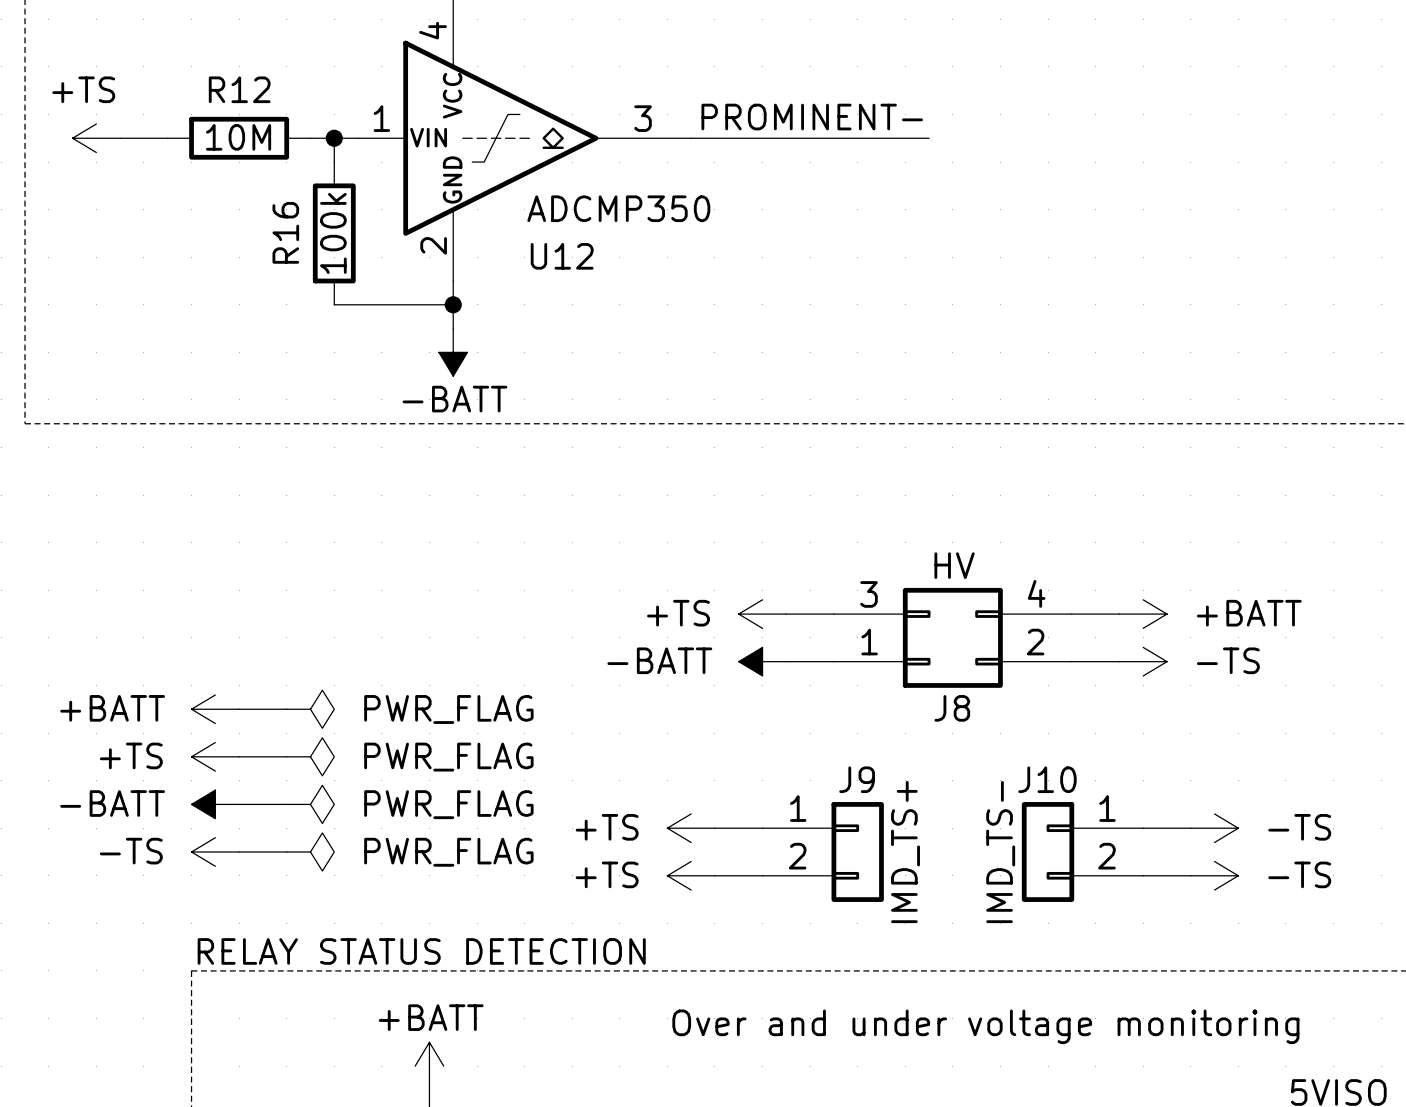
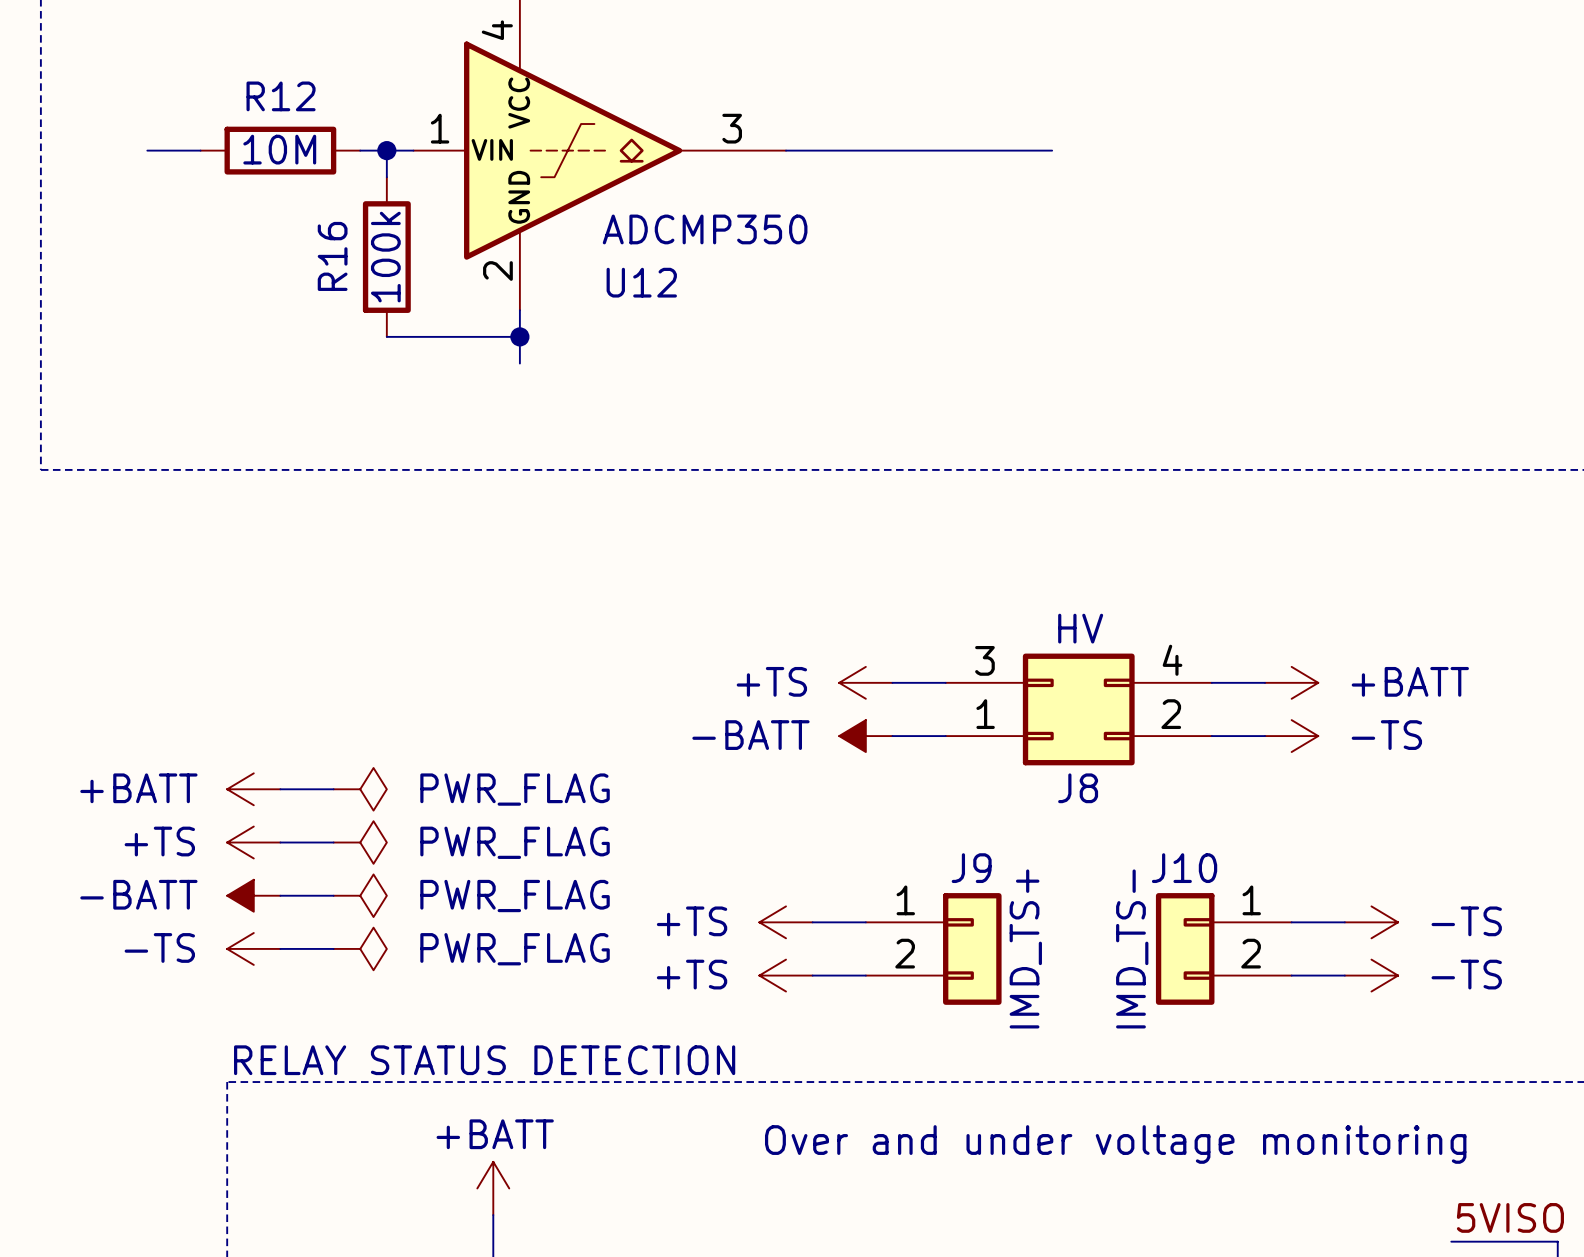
label: PROMINENT- (812, 117) -> none
power symbol: +TS (96, 138) -> none
power symbol: -BATT (453, 352) -> none

